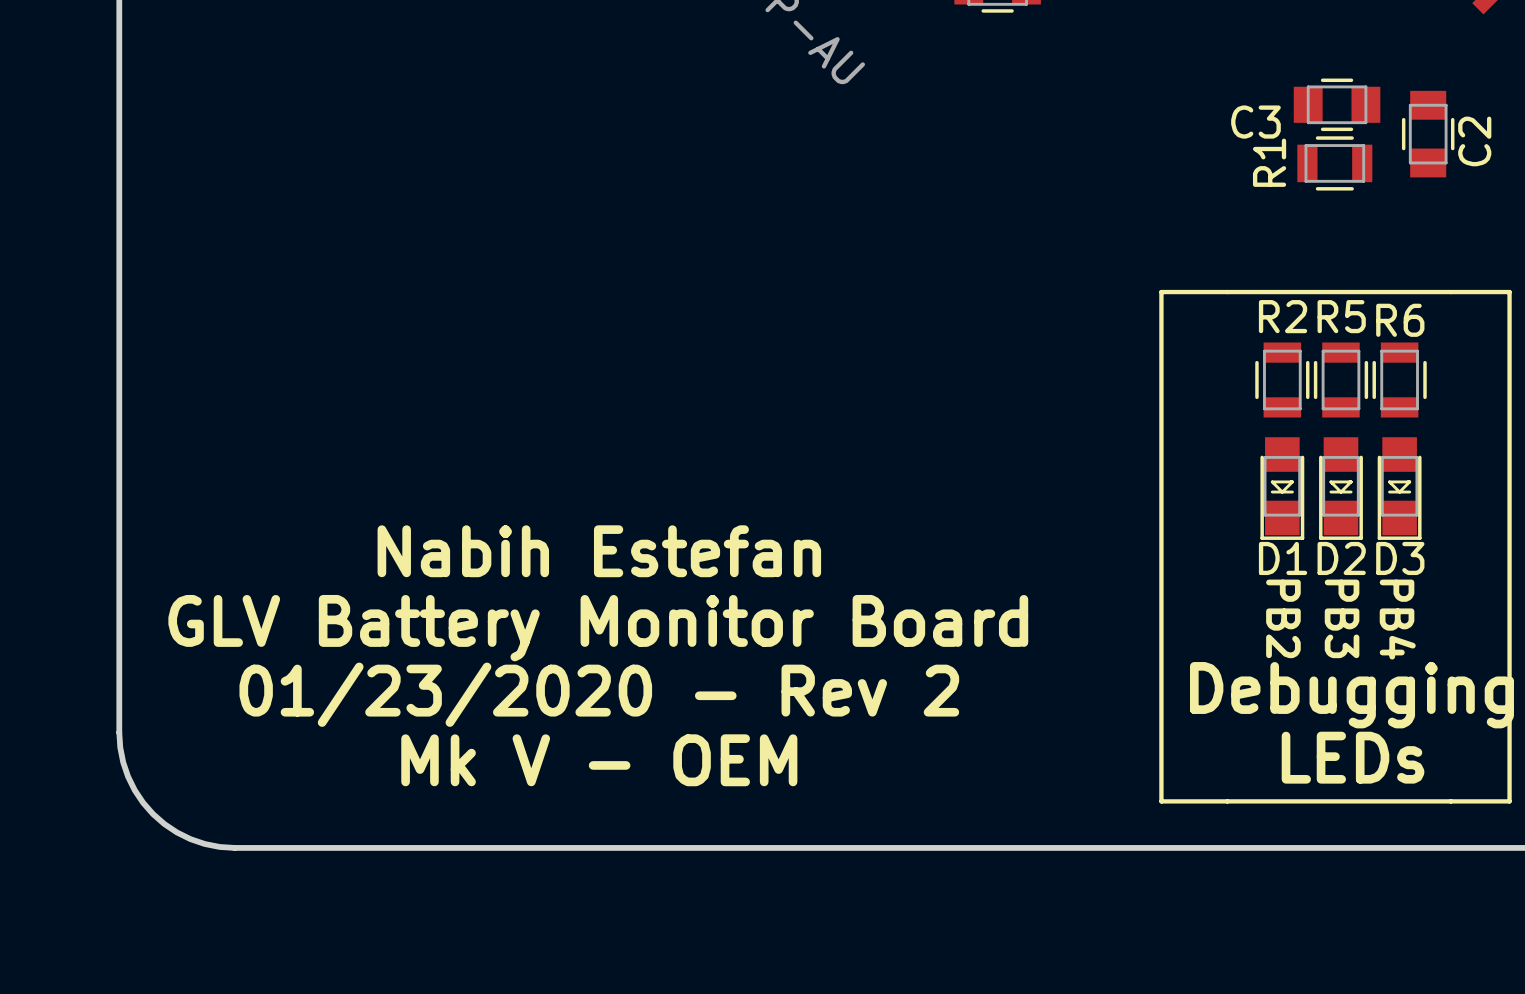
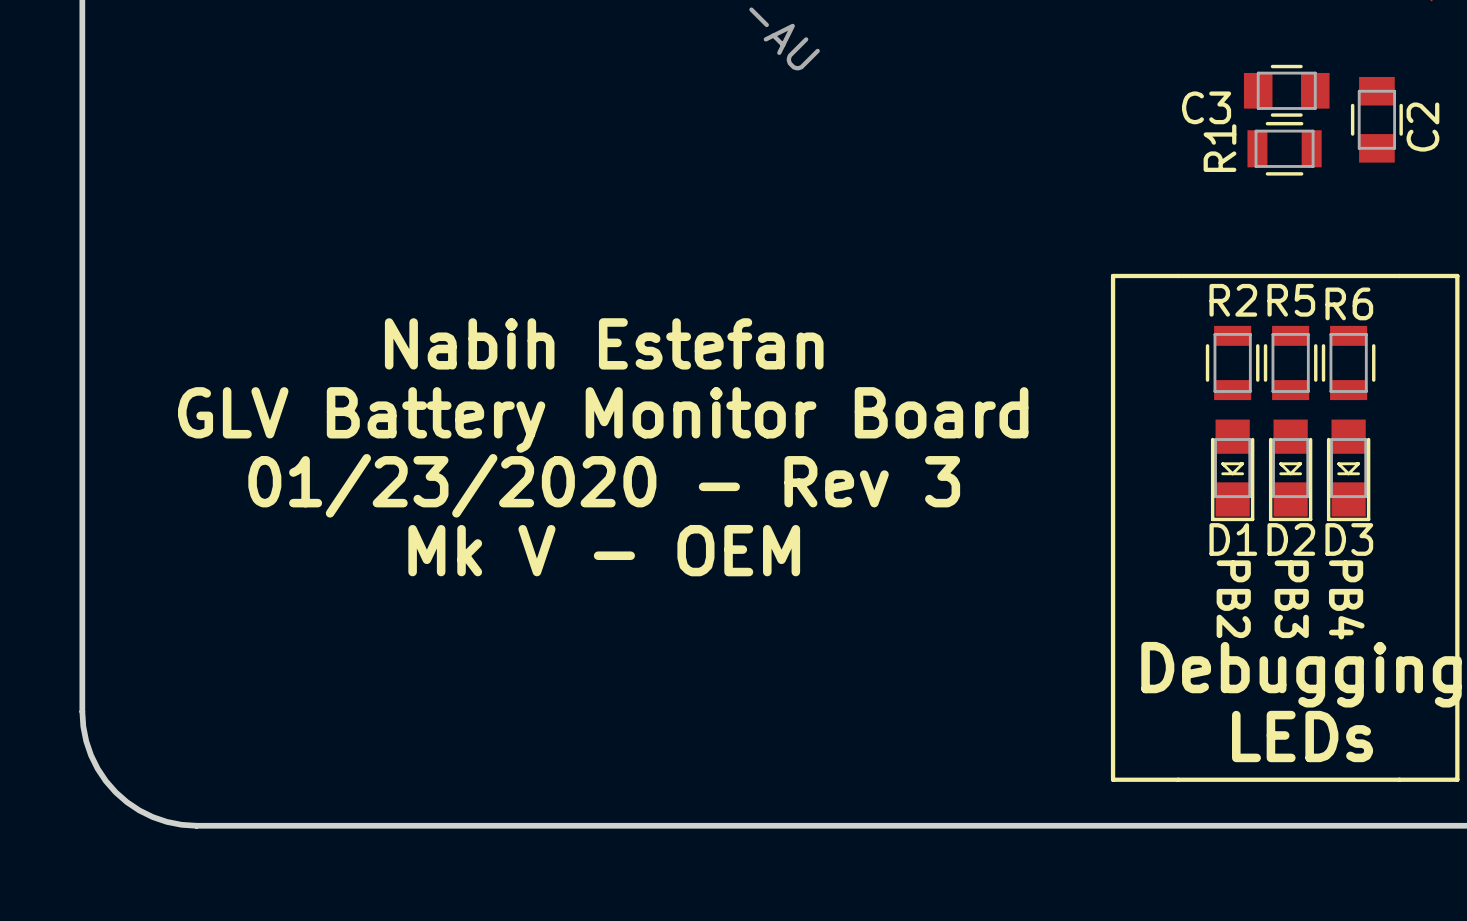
text: none -> 01/23/2020 - Rev 3 (604, 485)
text position: Nabih Estefan (599, 551) -> Nabih Estefan (604, 343)
text position: GLV Battery Monitor Board (598, 628) -> GLV Battery Monitor Board (603, 419)
text: 01/23/2020 - Rev 2 (599, 694) -> none
text position: Mk V - OEM (599, 760) -> Mk V - OEM (604, 550)

